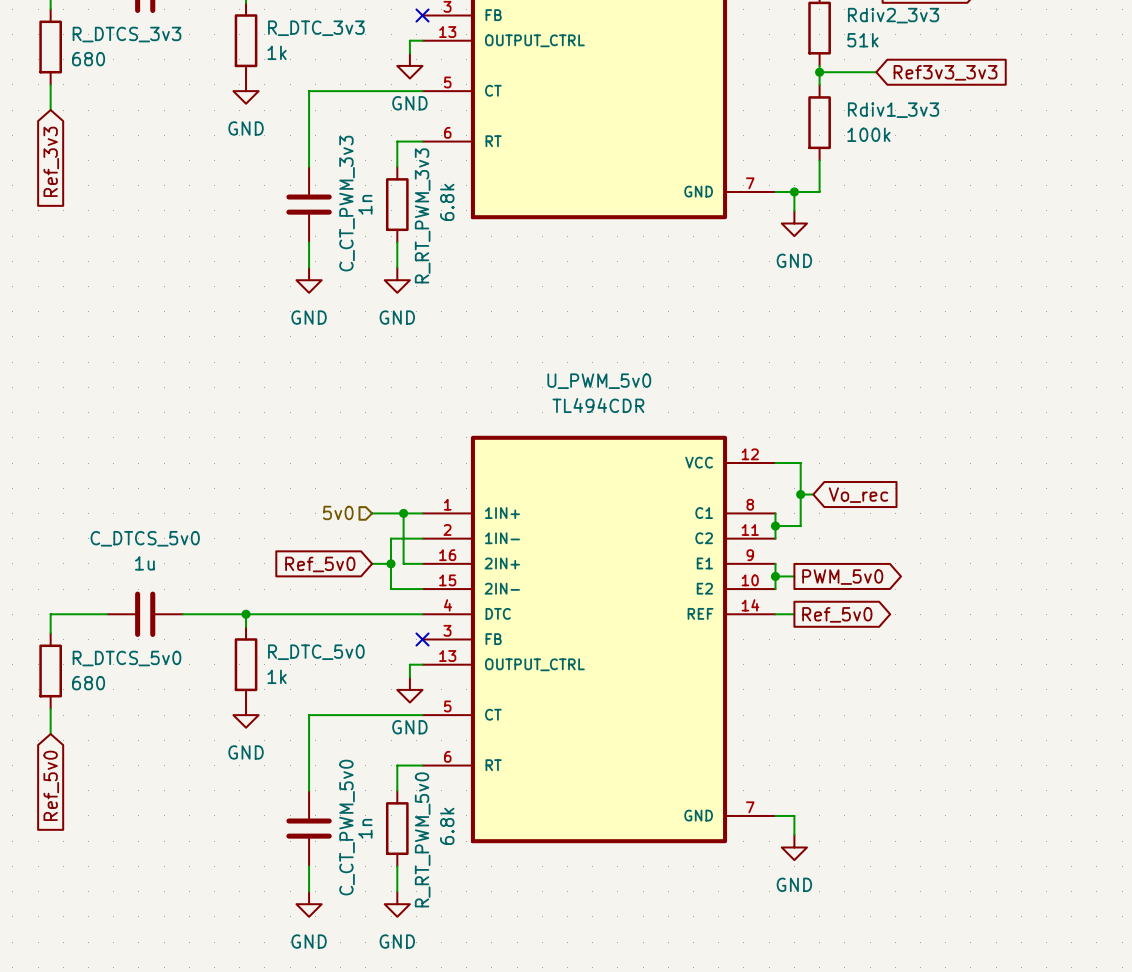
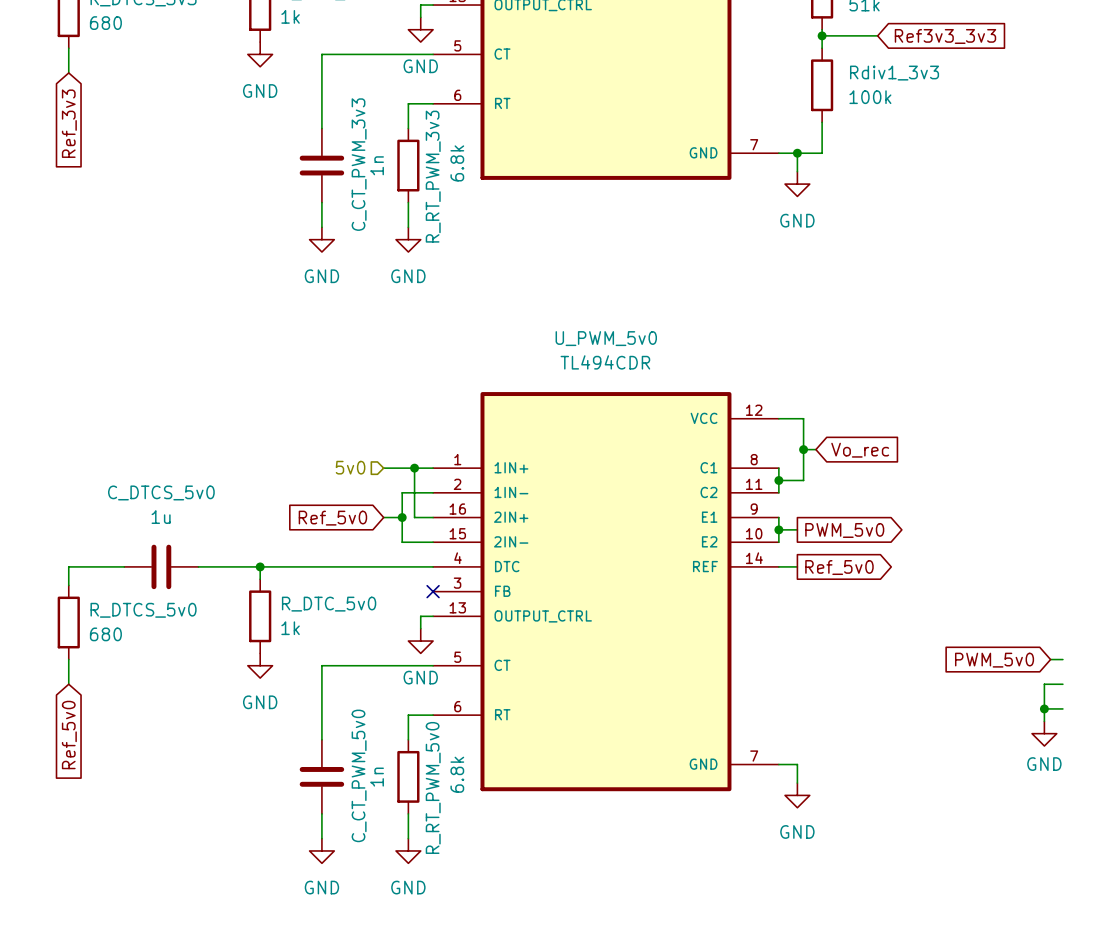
wire: none -> (1050, 659) (1062, 659)
global label: none -> PWM_5v0 (994, 660)
wire: none -> (1062, 684) (1044, 684) (1044, 721)
wire: none -> (1044, 708) (1062, 708)
junction: none -> (1044, 708)
power symbol: none -> GND (1044, 733)

